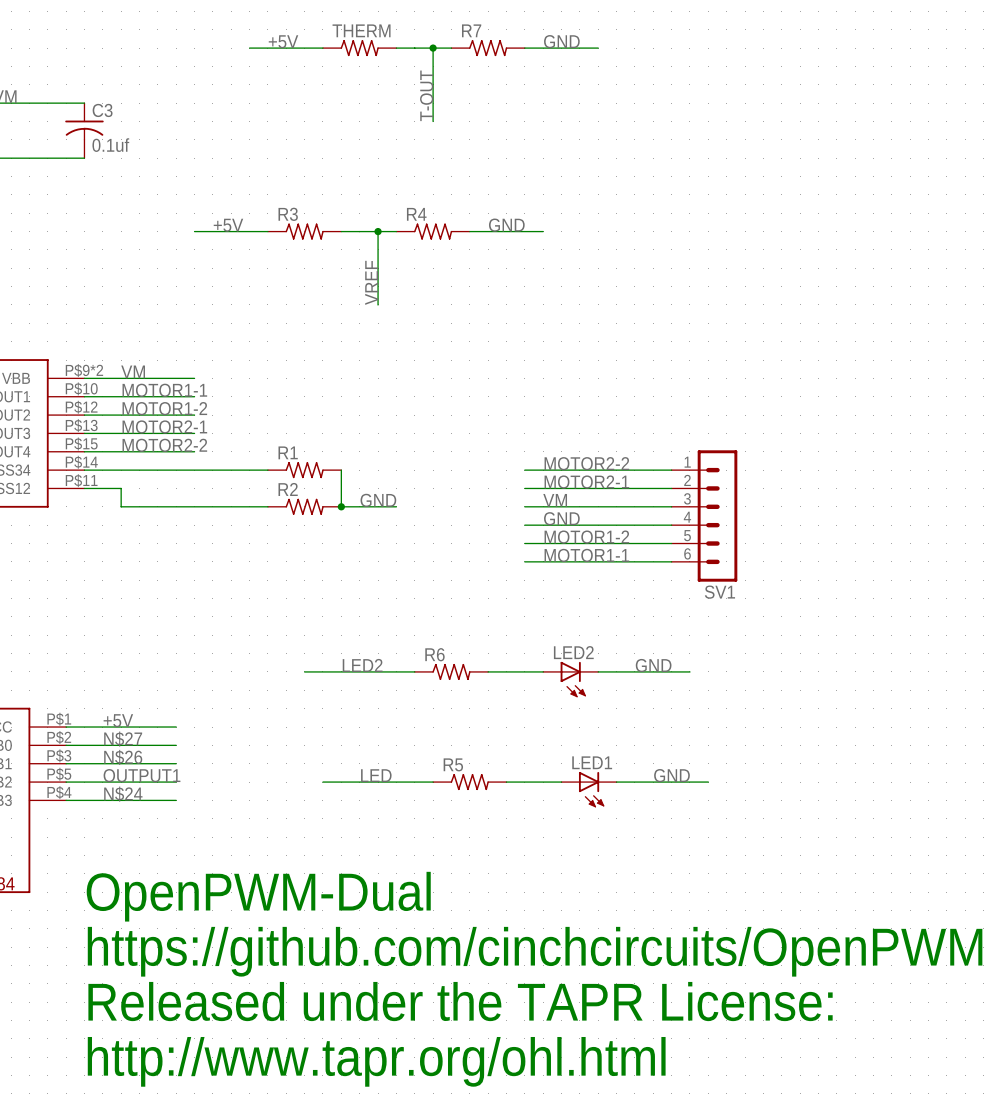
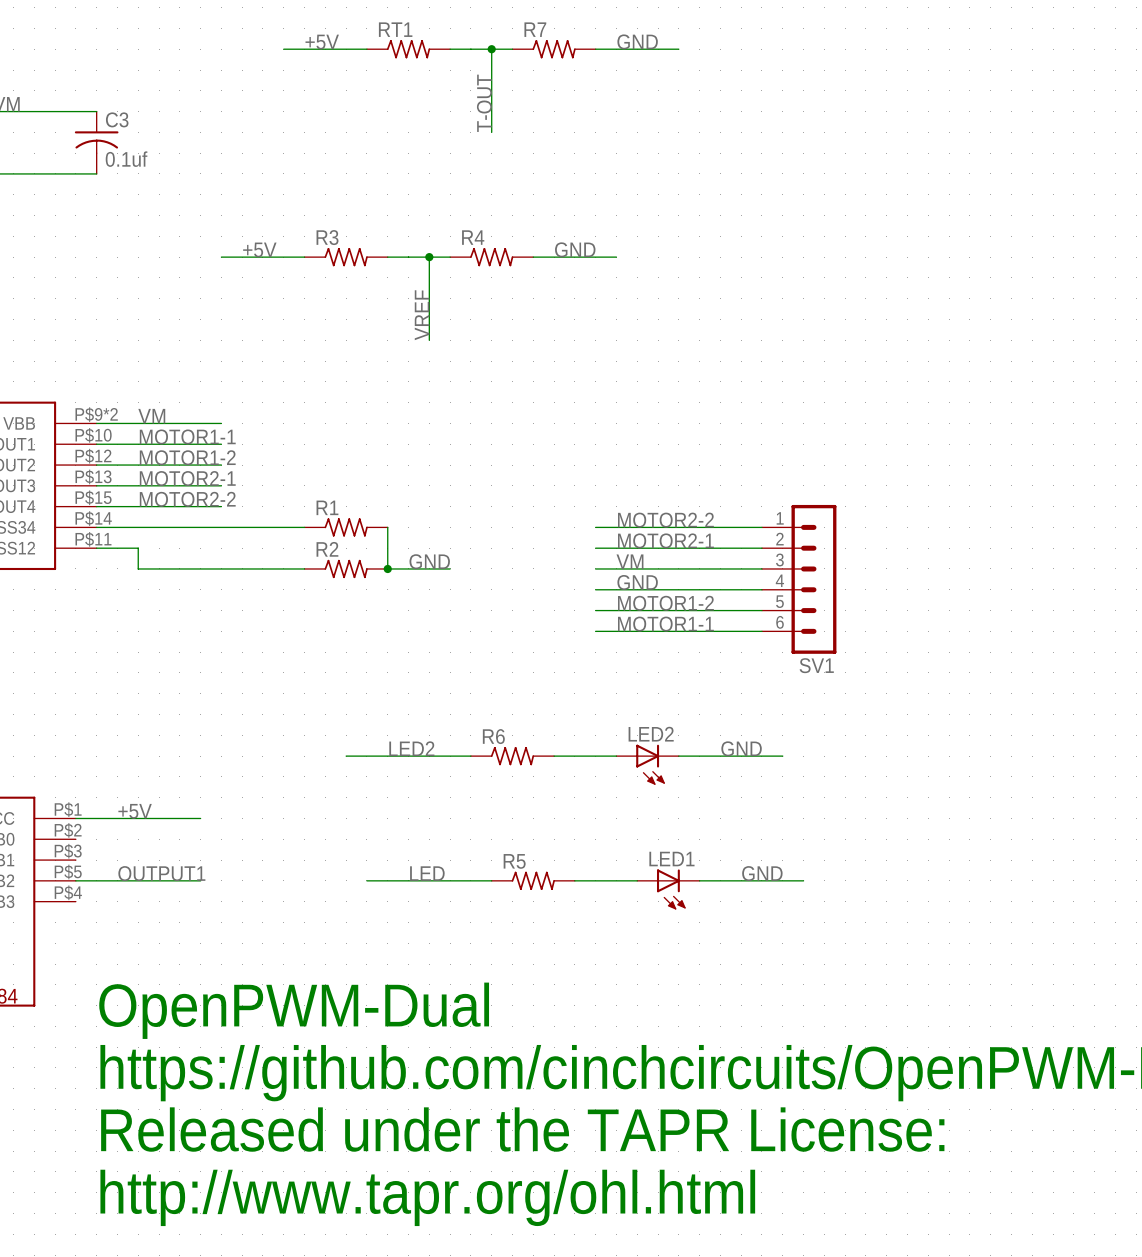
THERM name: THERM (361, 30) -> RT1 (395, 29)
label: N$27 (123, 739) -> none
wire: (66, 745) (176, 745) -> none
label: N$26 (123, 757) -> none
wire: (66, 763) (176, 763) -> none
label: N$24 (123, 794) -> none
wire: (66, 800) (176, 800) -> none

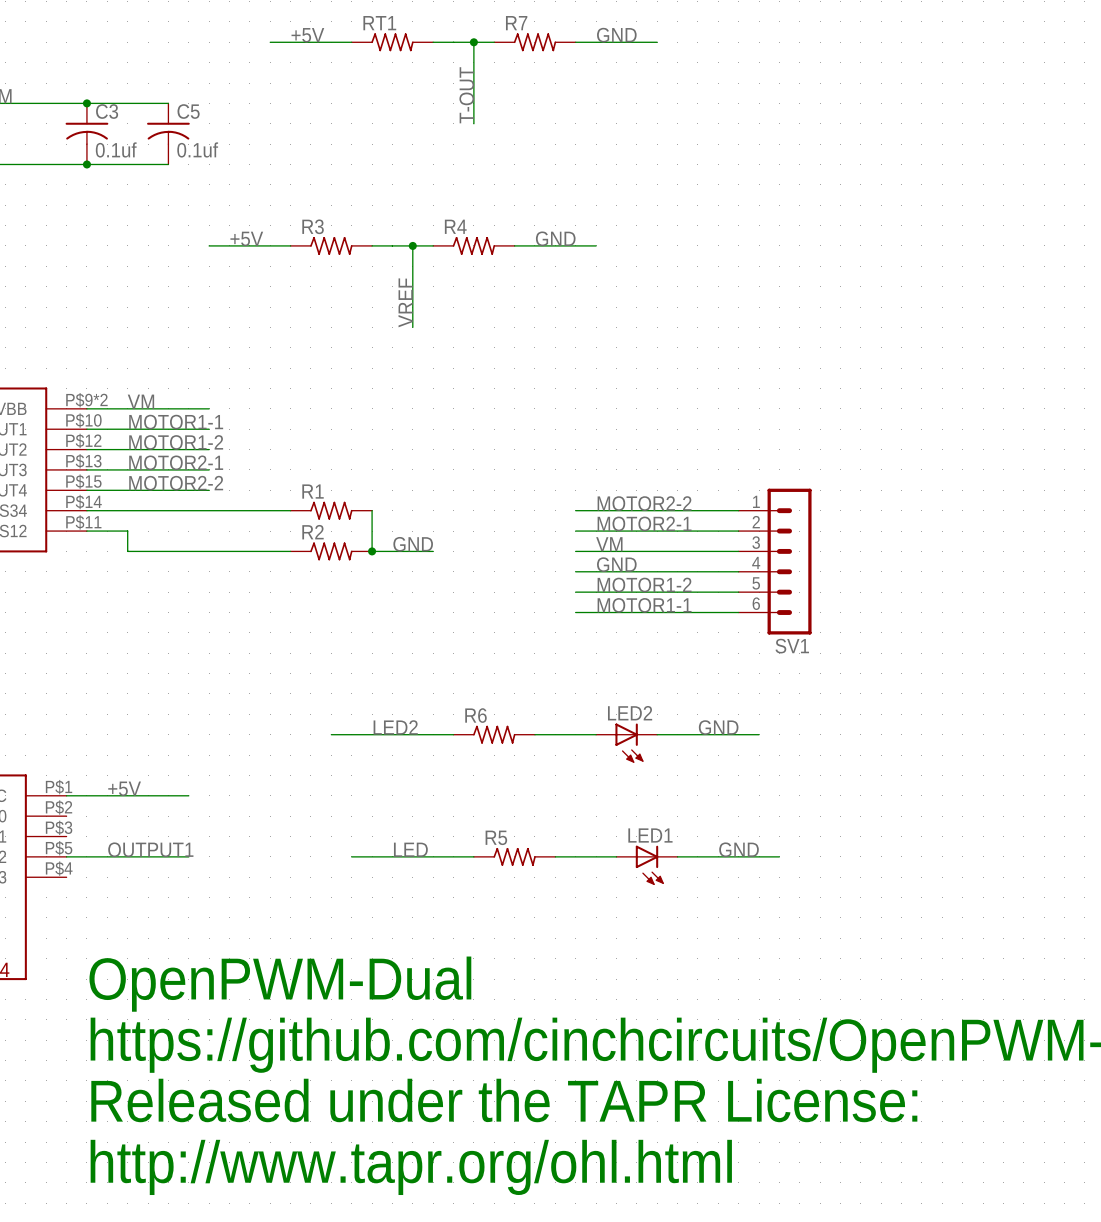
wire: none -> (86, 103) (168, 103)
junction: none -> (86, 103)
C5: none -> 0.1uf (168, 133)
wire: none -> (86, 164) (168, 164)
junction: none -> (86, 164)

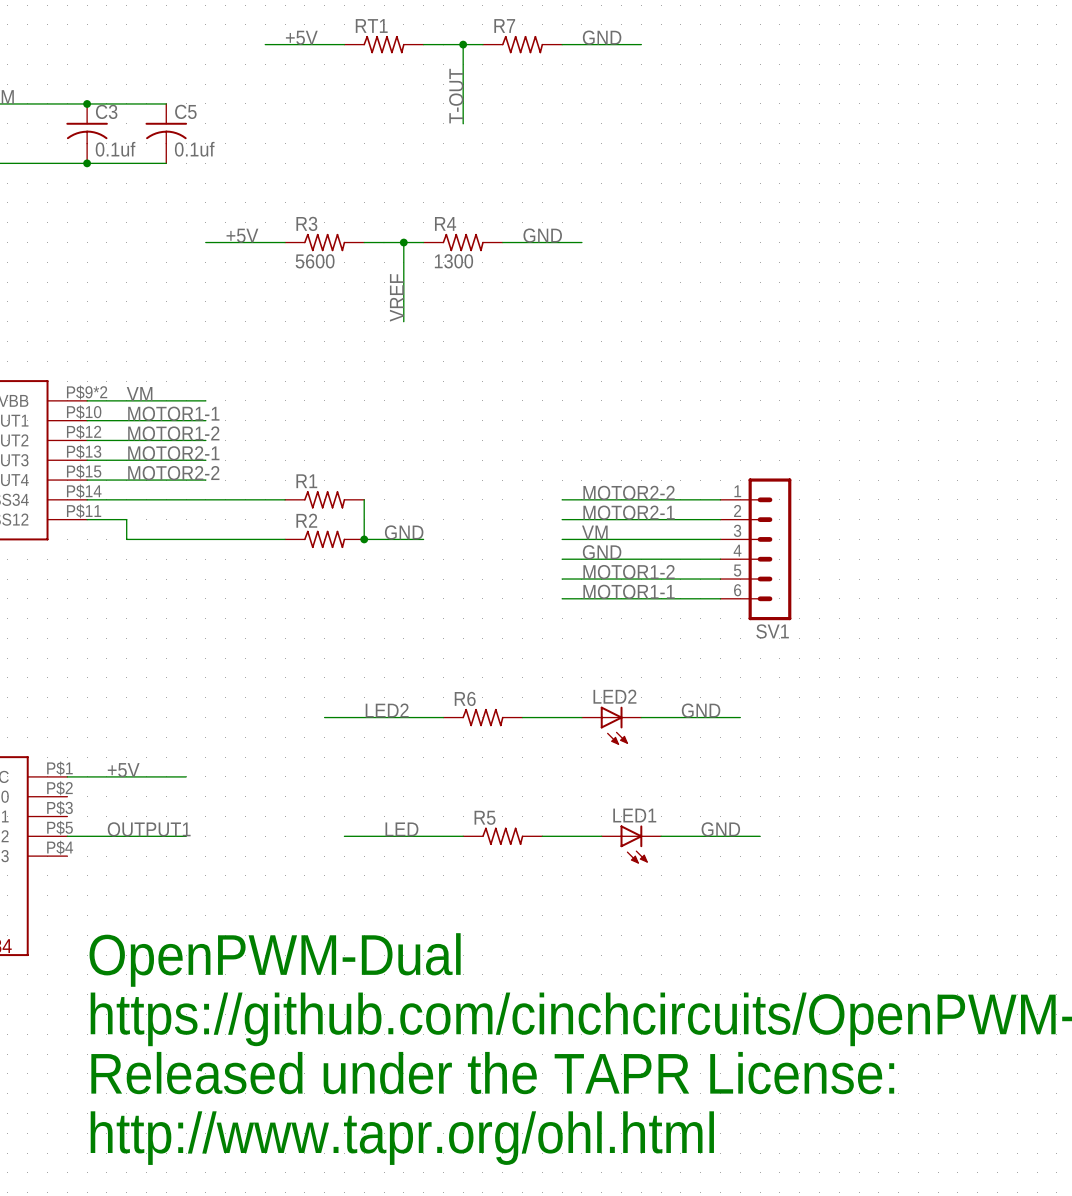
R3 value: none -> 5600 (315, 261)
R4 value: none -> 1300 (453, 261)

